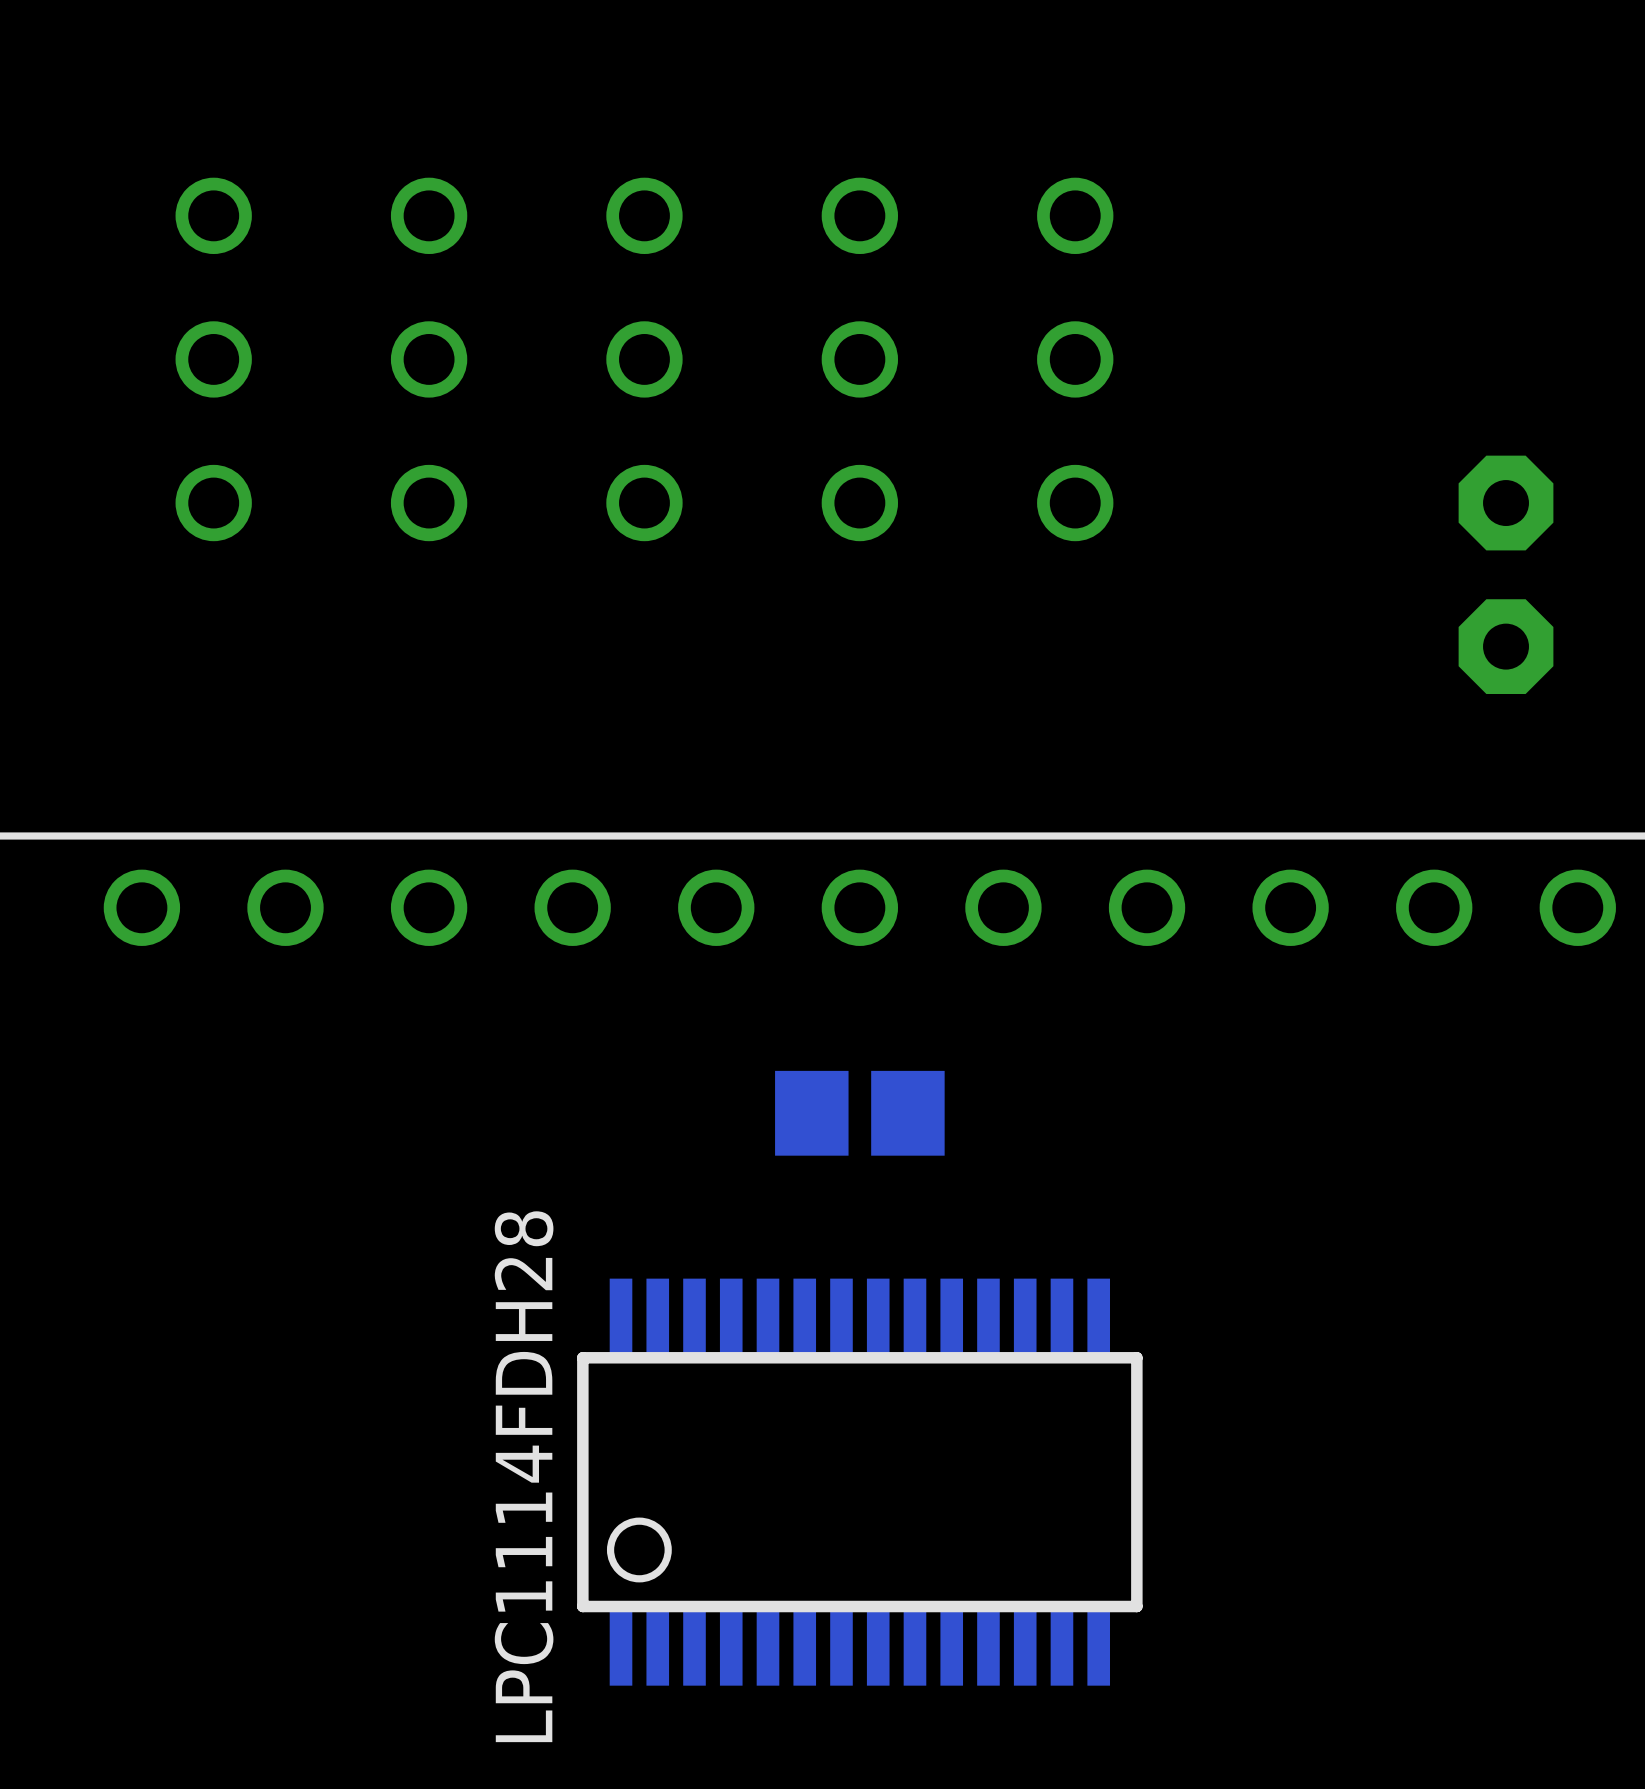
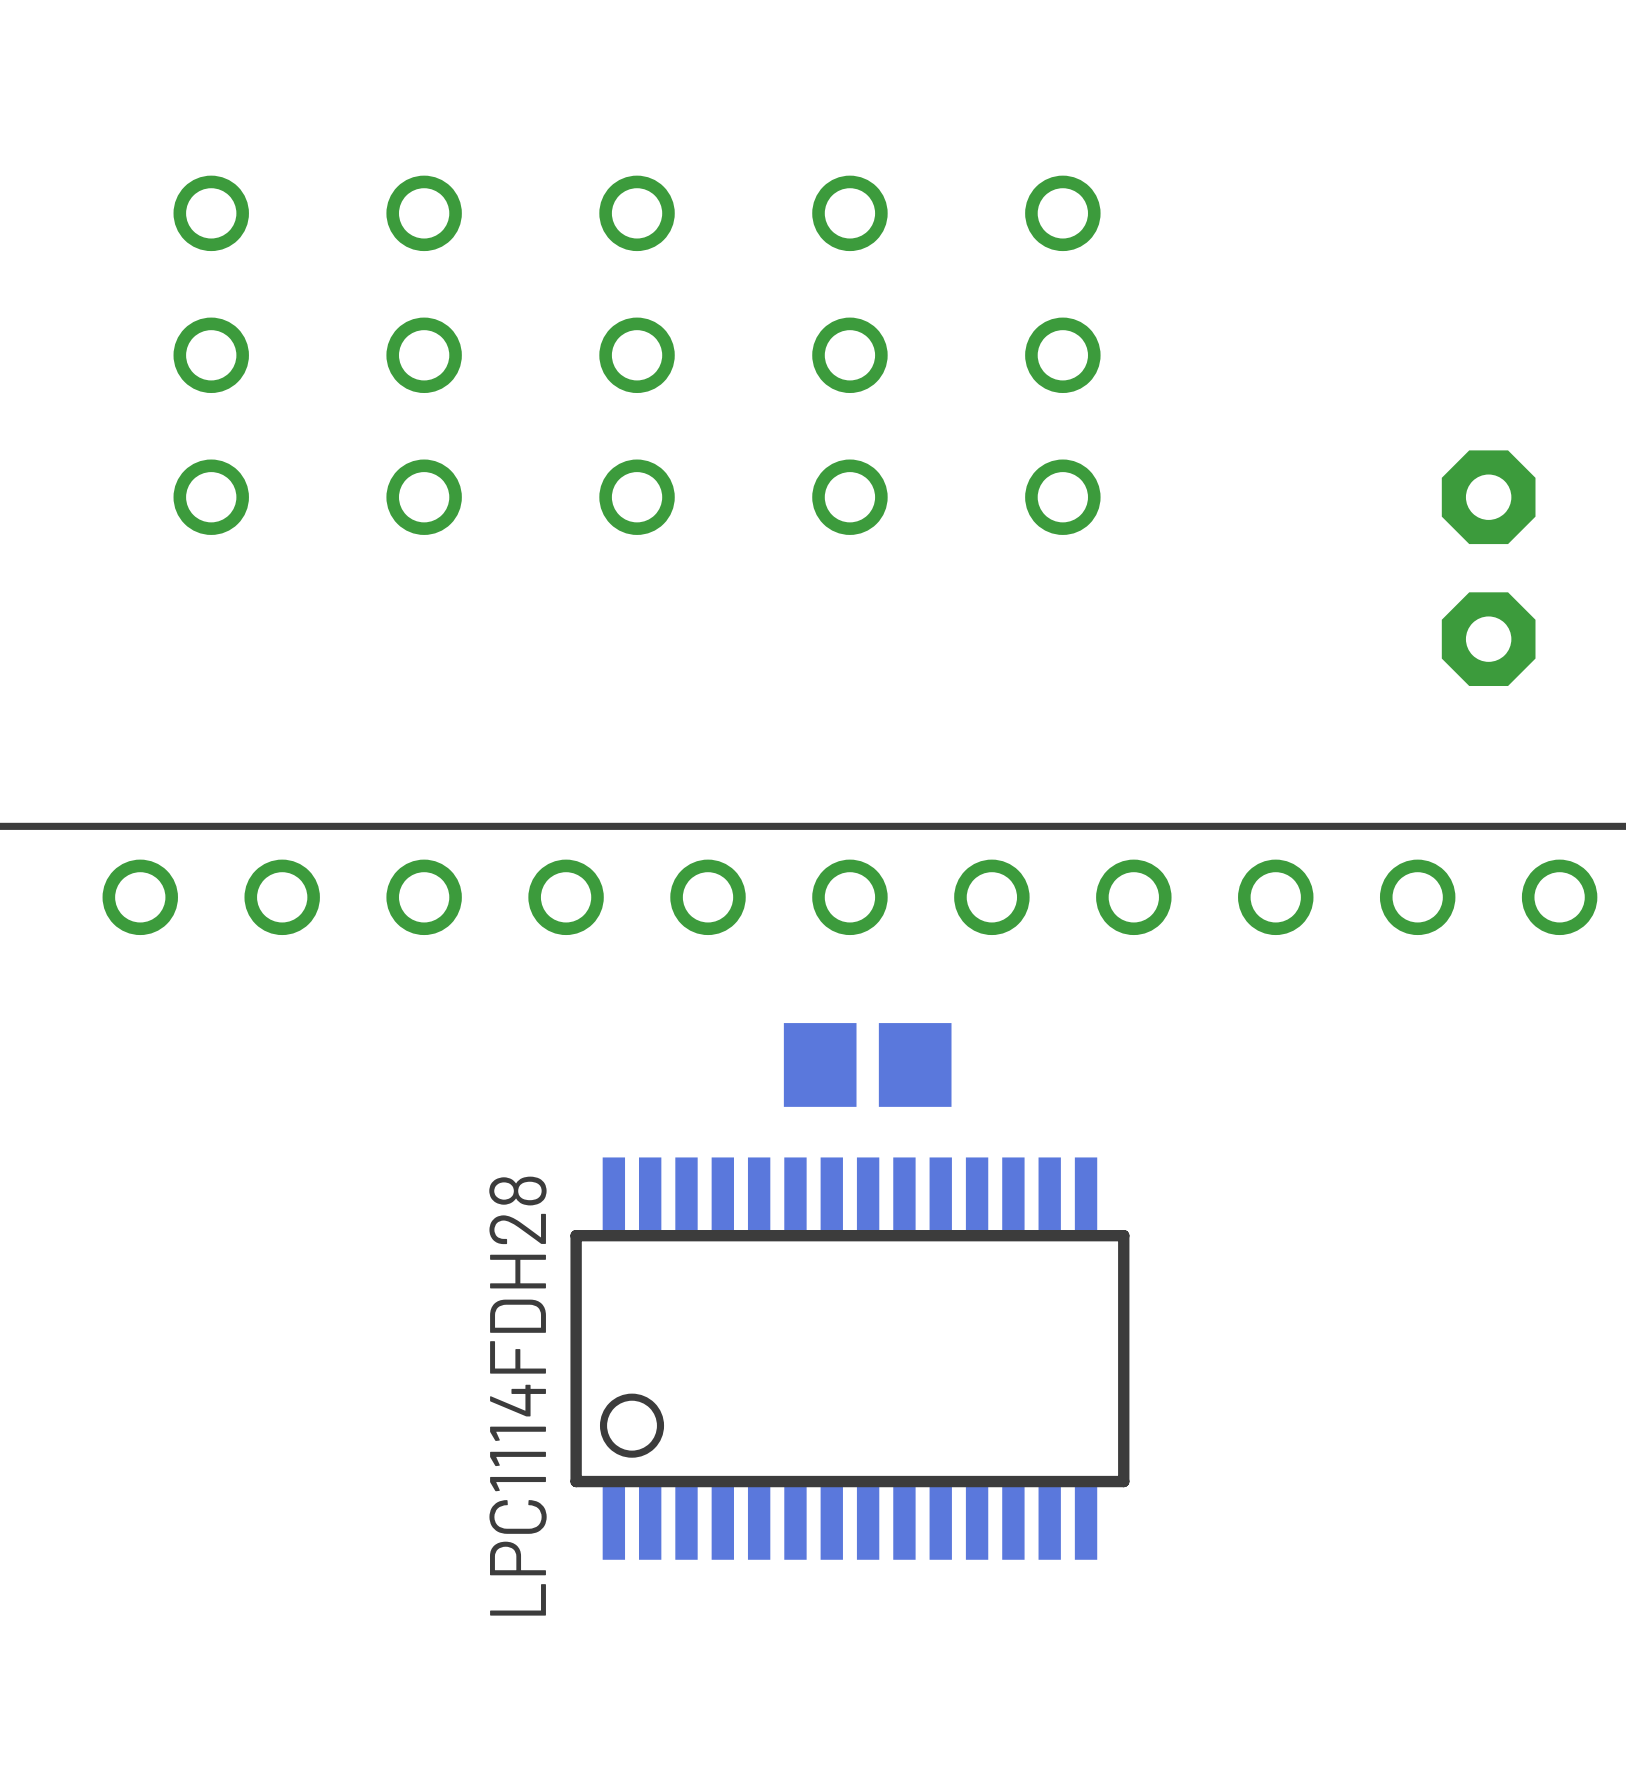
part position: (859, 1113) -> (867, 1064)
part position: (859, 1482) -> (849, 1358)

